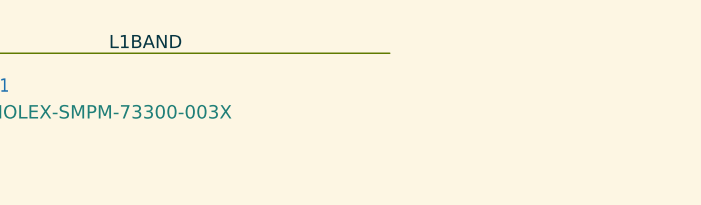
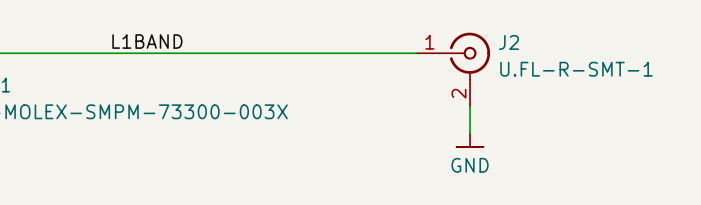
wire: none -> (389, 53) (416, 53)
J2: none -> U.FL-R-SMT-1 (453, 69)
wire: none -> (470, 106) (470, 133)
power symbol: none -> GND (470, 140)

